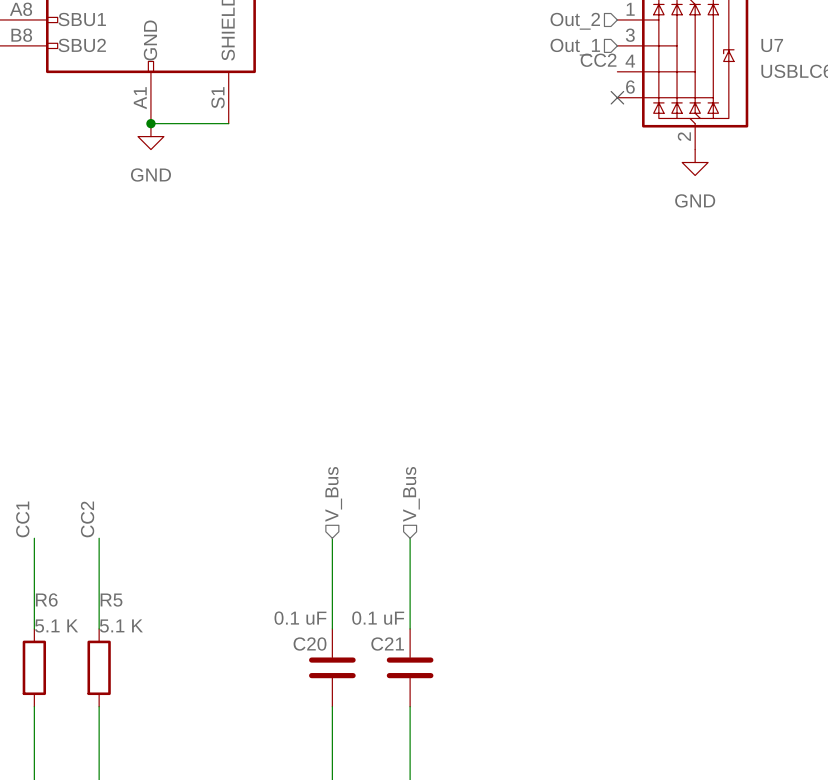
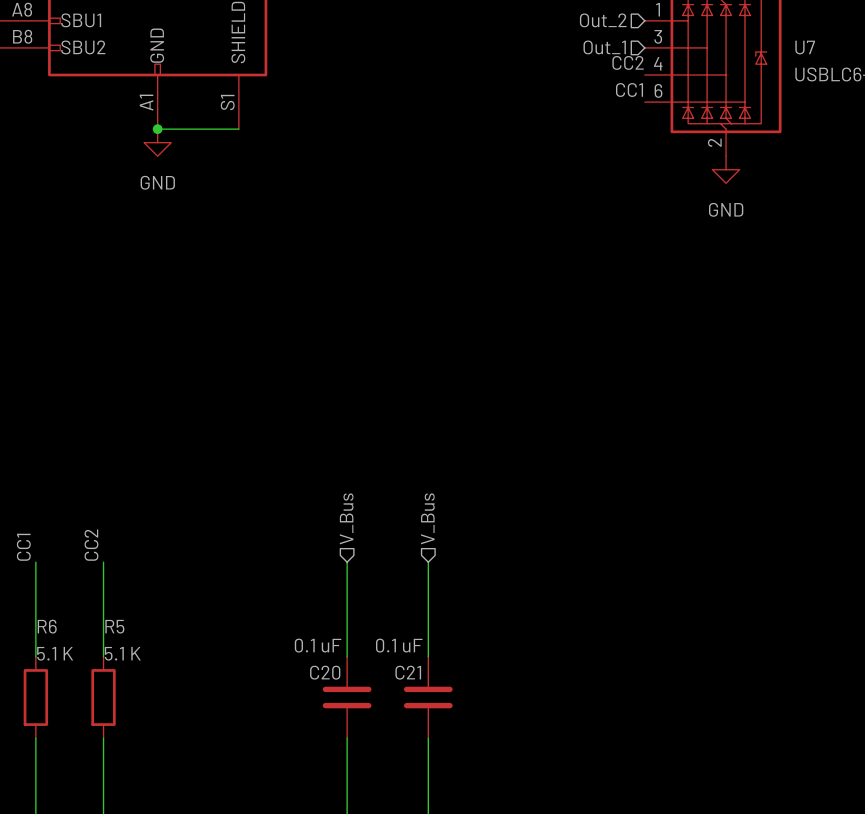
label: none -> CC1 (629, 90)
no-connect mark: (617, 97) -> none

